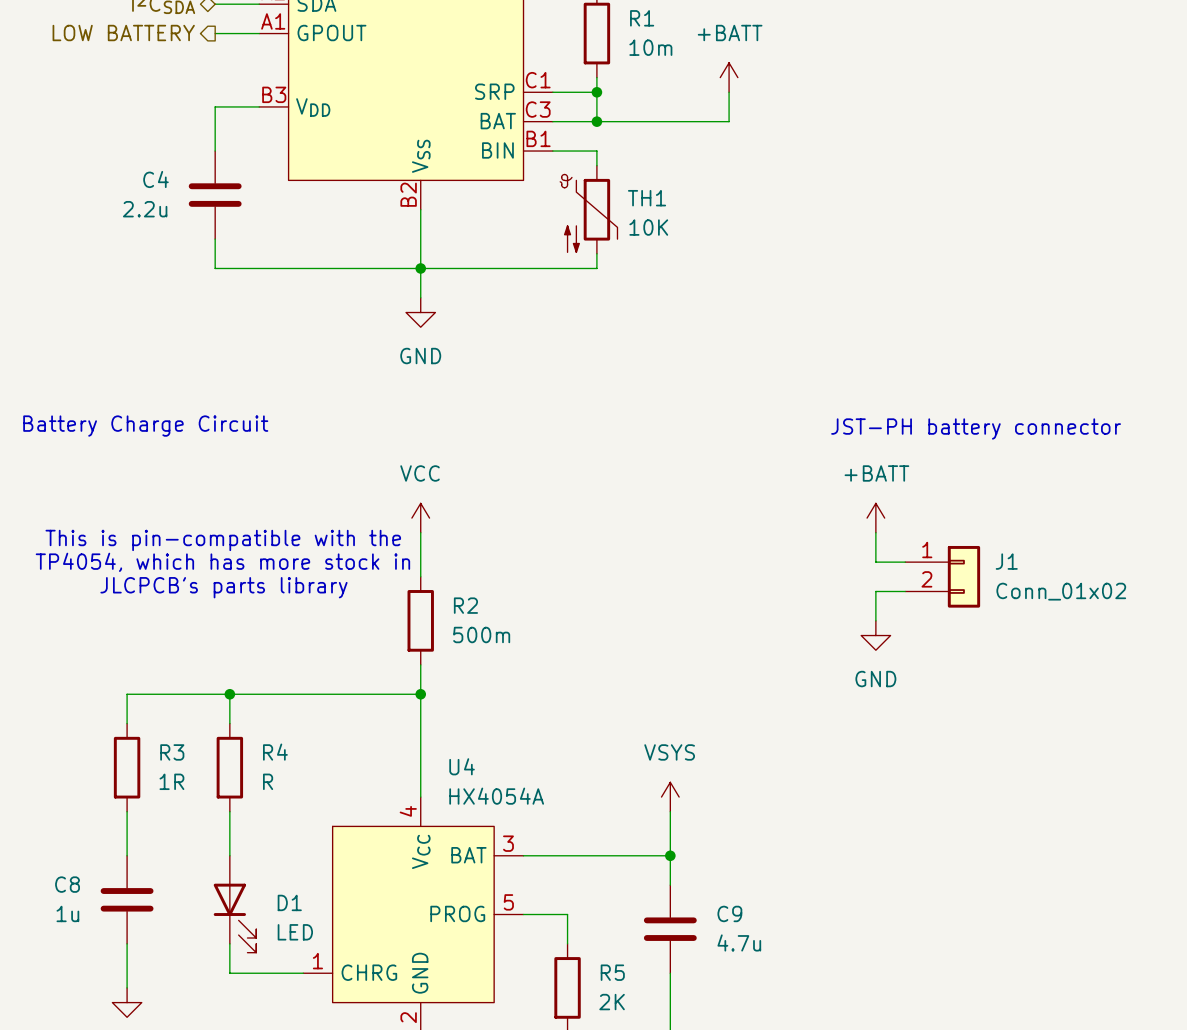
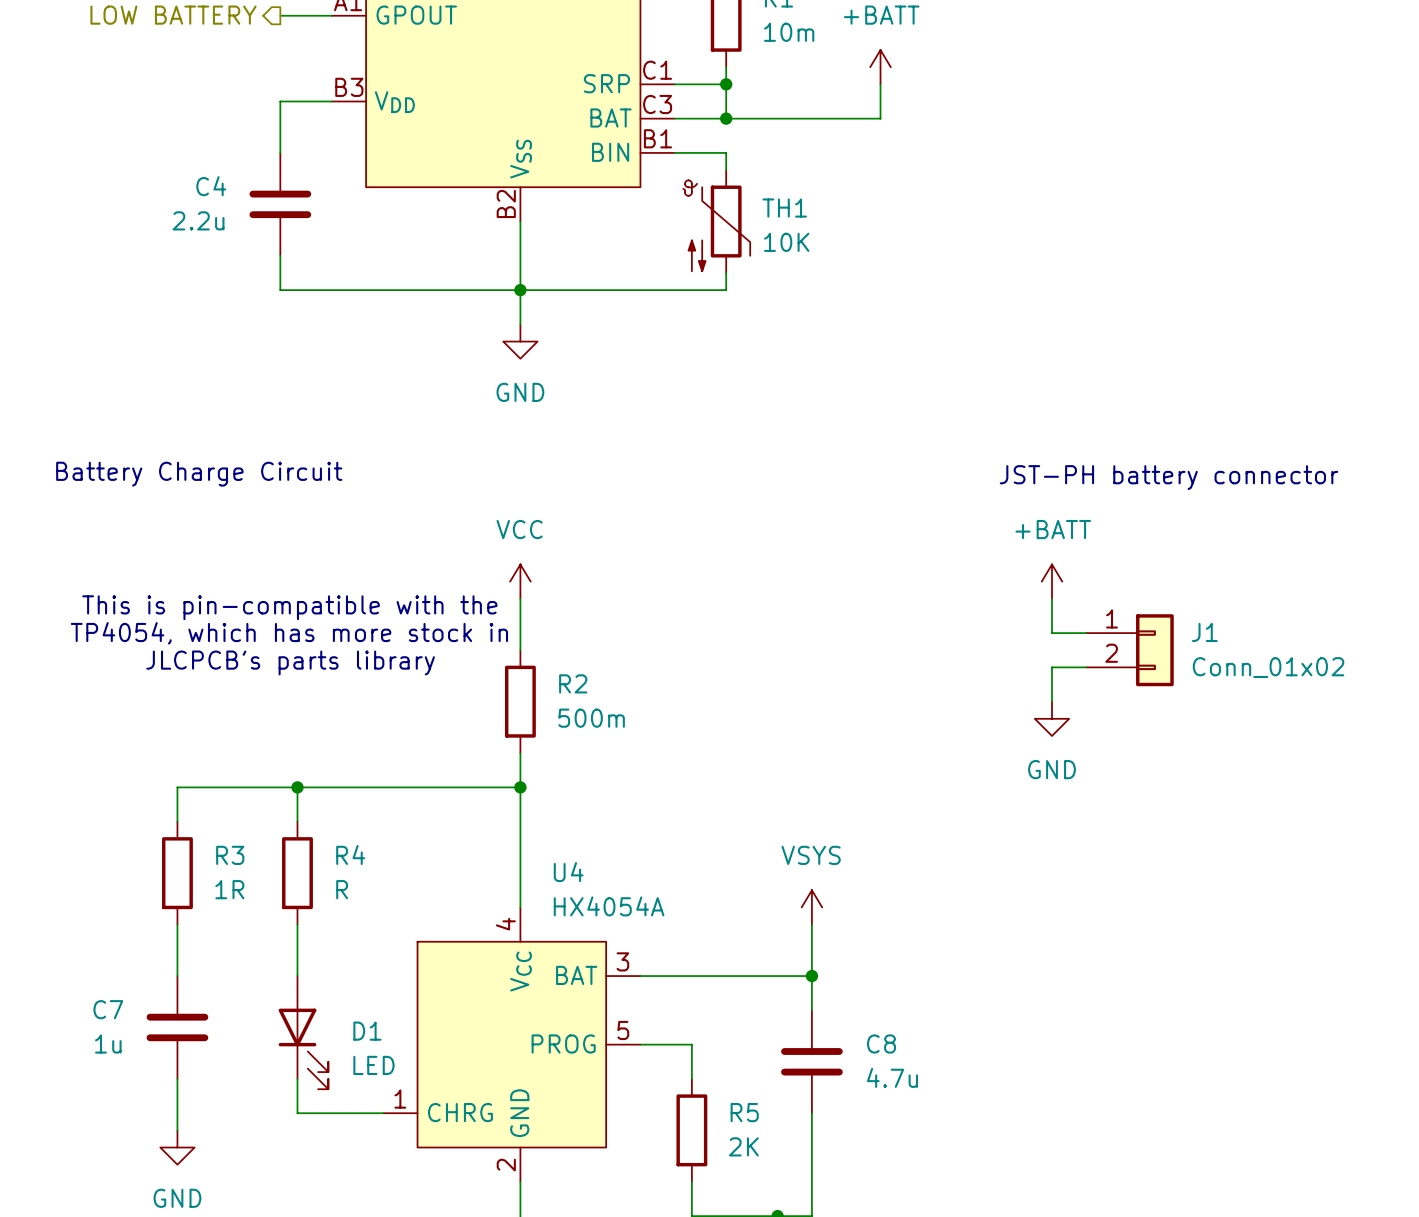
C8 name: C8 (67, 884) -> C7 (108, 1009)
C9 name: C9 (729, 913) -> C8 (881, 1043)

